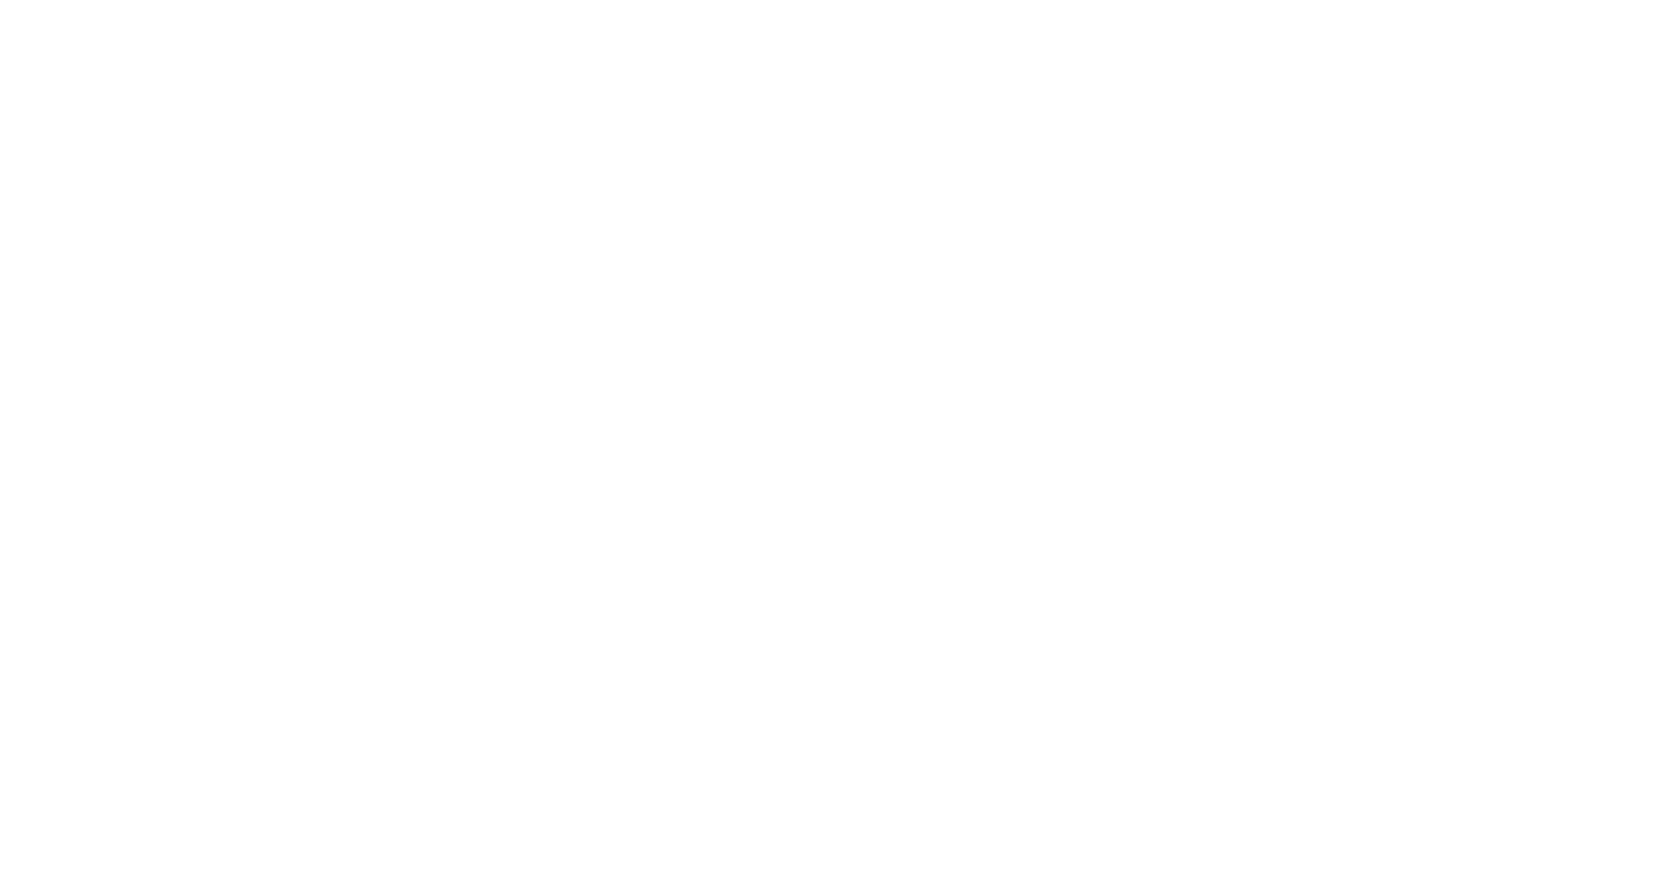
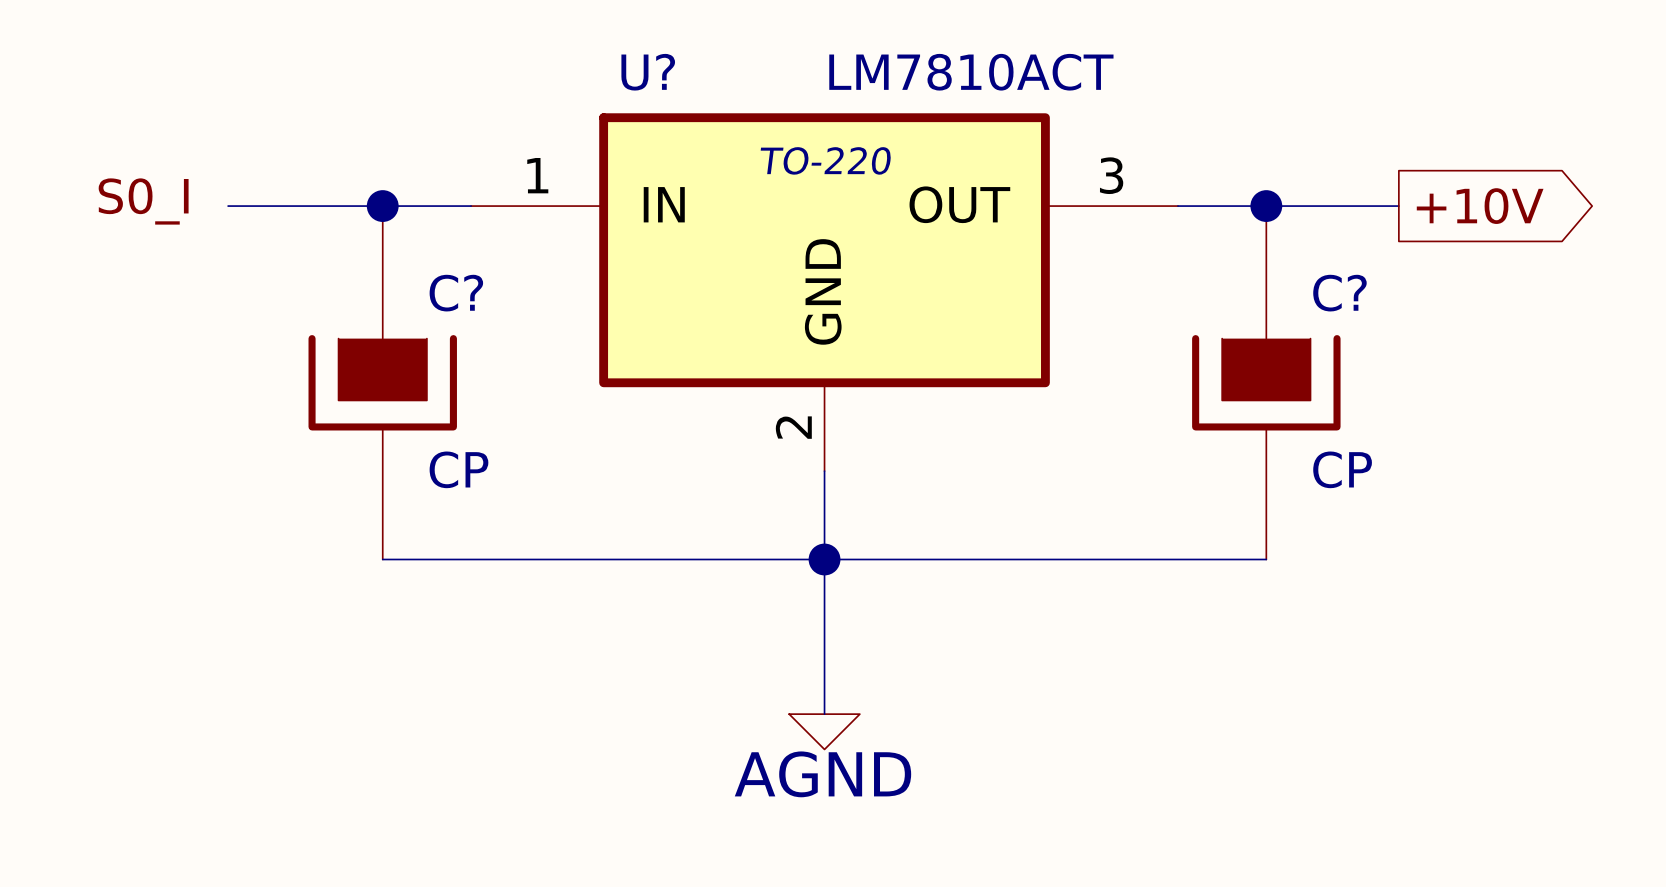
label: none -> S0_I (143, 201)
wire: none -> (228, 206) (471, 206)
junction: none -> (382, 206)
wire: none -> (1177, 206) (1398, 206)
junction: none -> (1266, 206)
global label: none -> +10V (1480, 206)
U?: none -> LM7810ACT (824, 292)
C?: none -> CP (382, 382)
C?: none -> CP (1266, 382)
wire: none -> (824, 471) (824, 714)
wire: none -> (382, 559) (1266, 559)
junction: none -> (824, 559)
power symbol: none -> AGND (824, 731)

